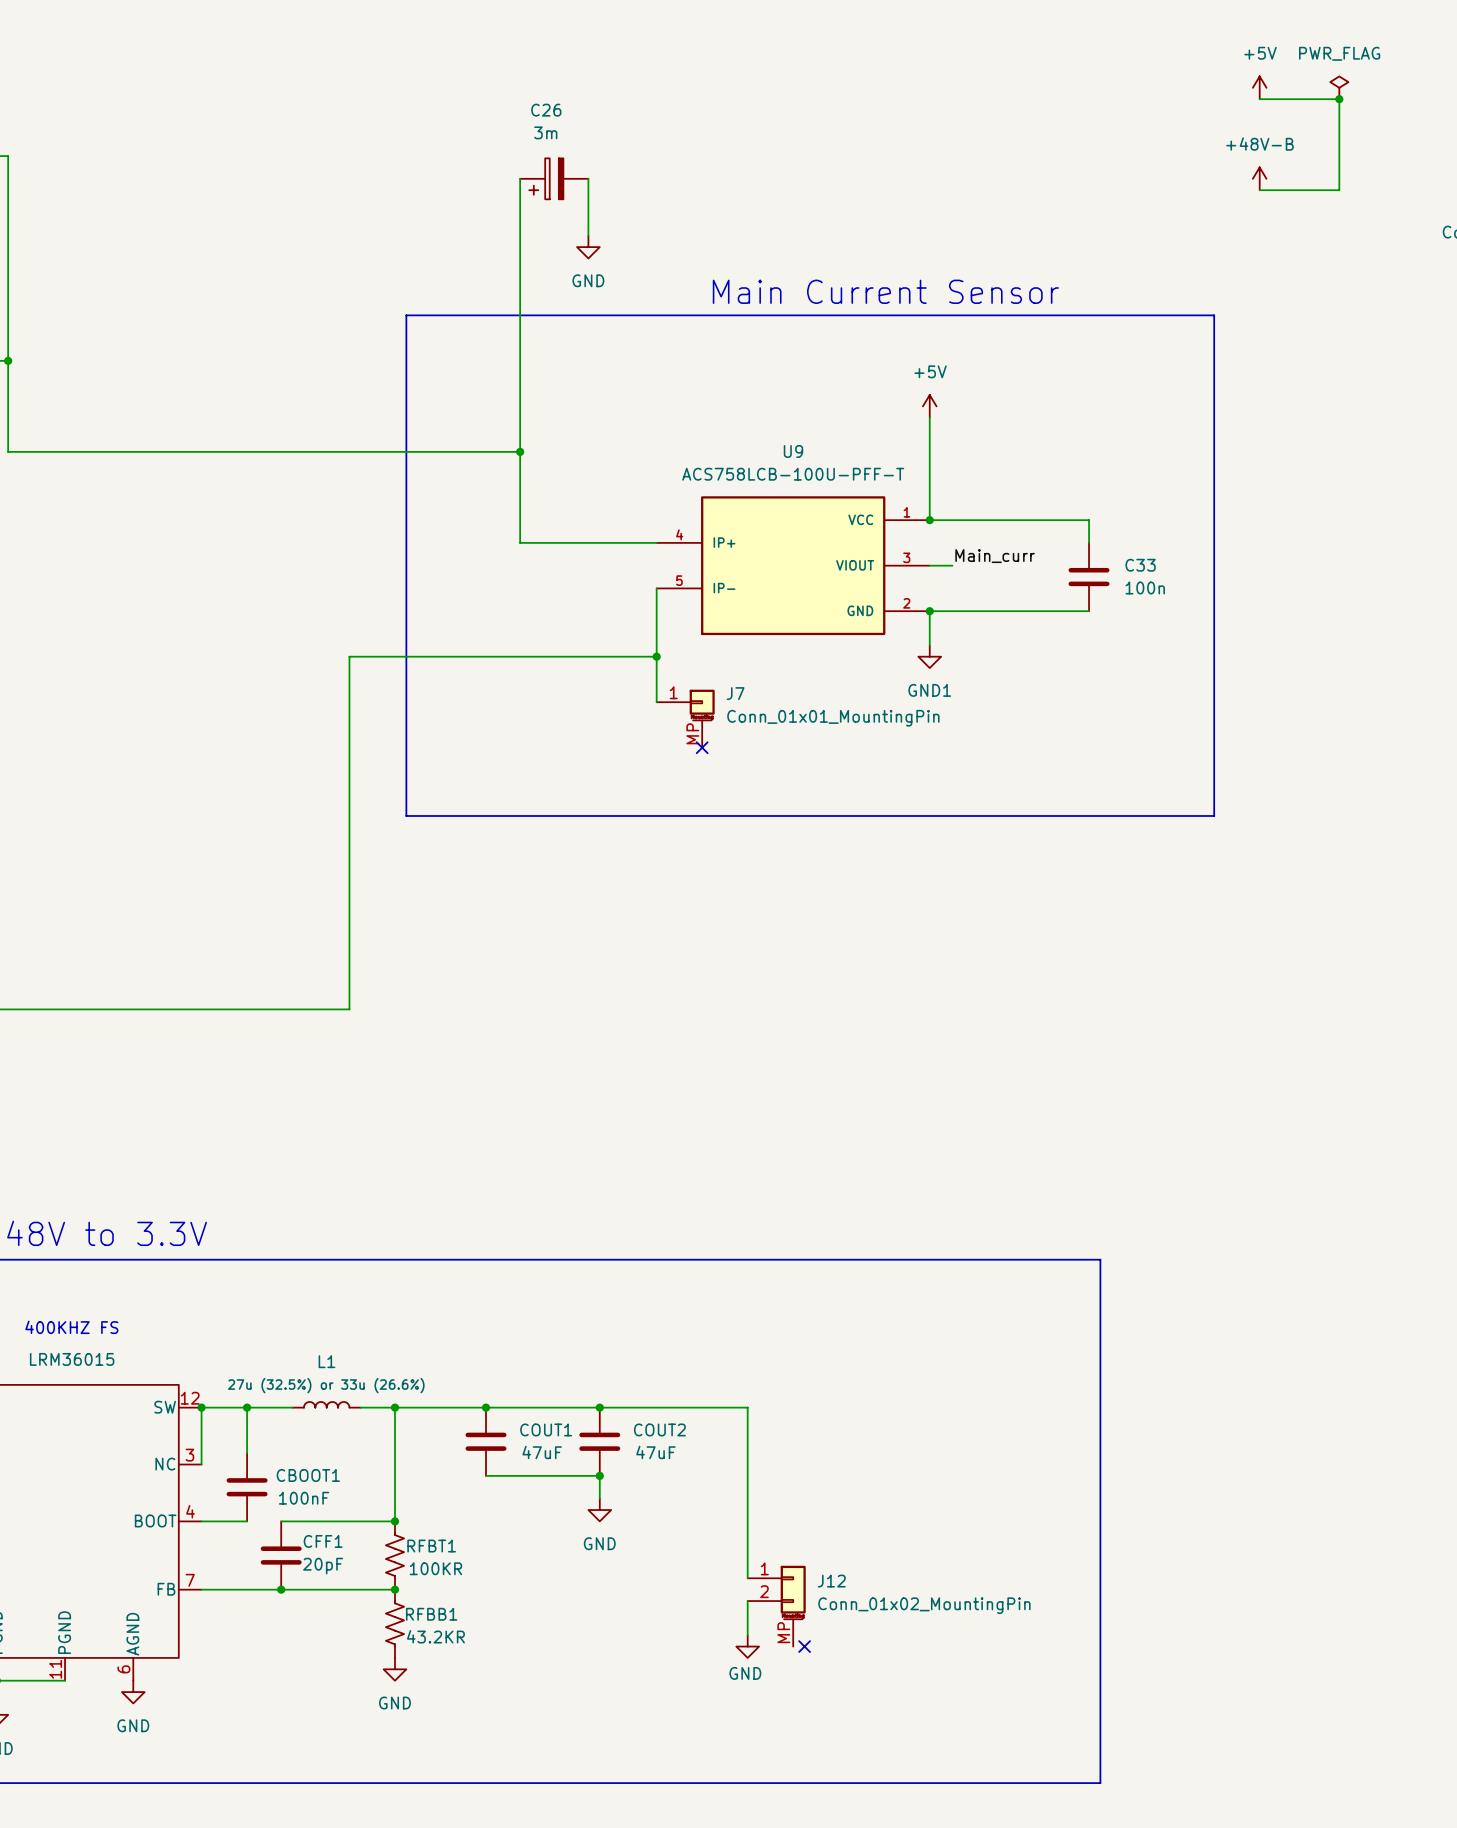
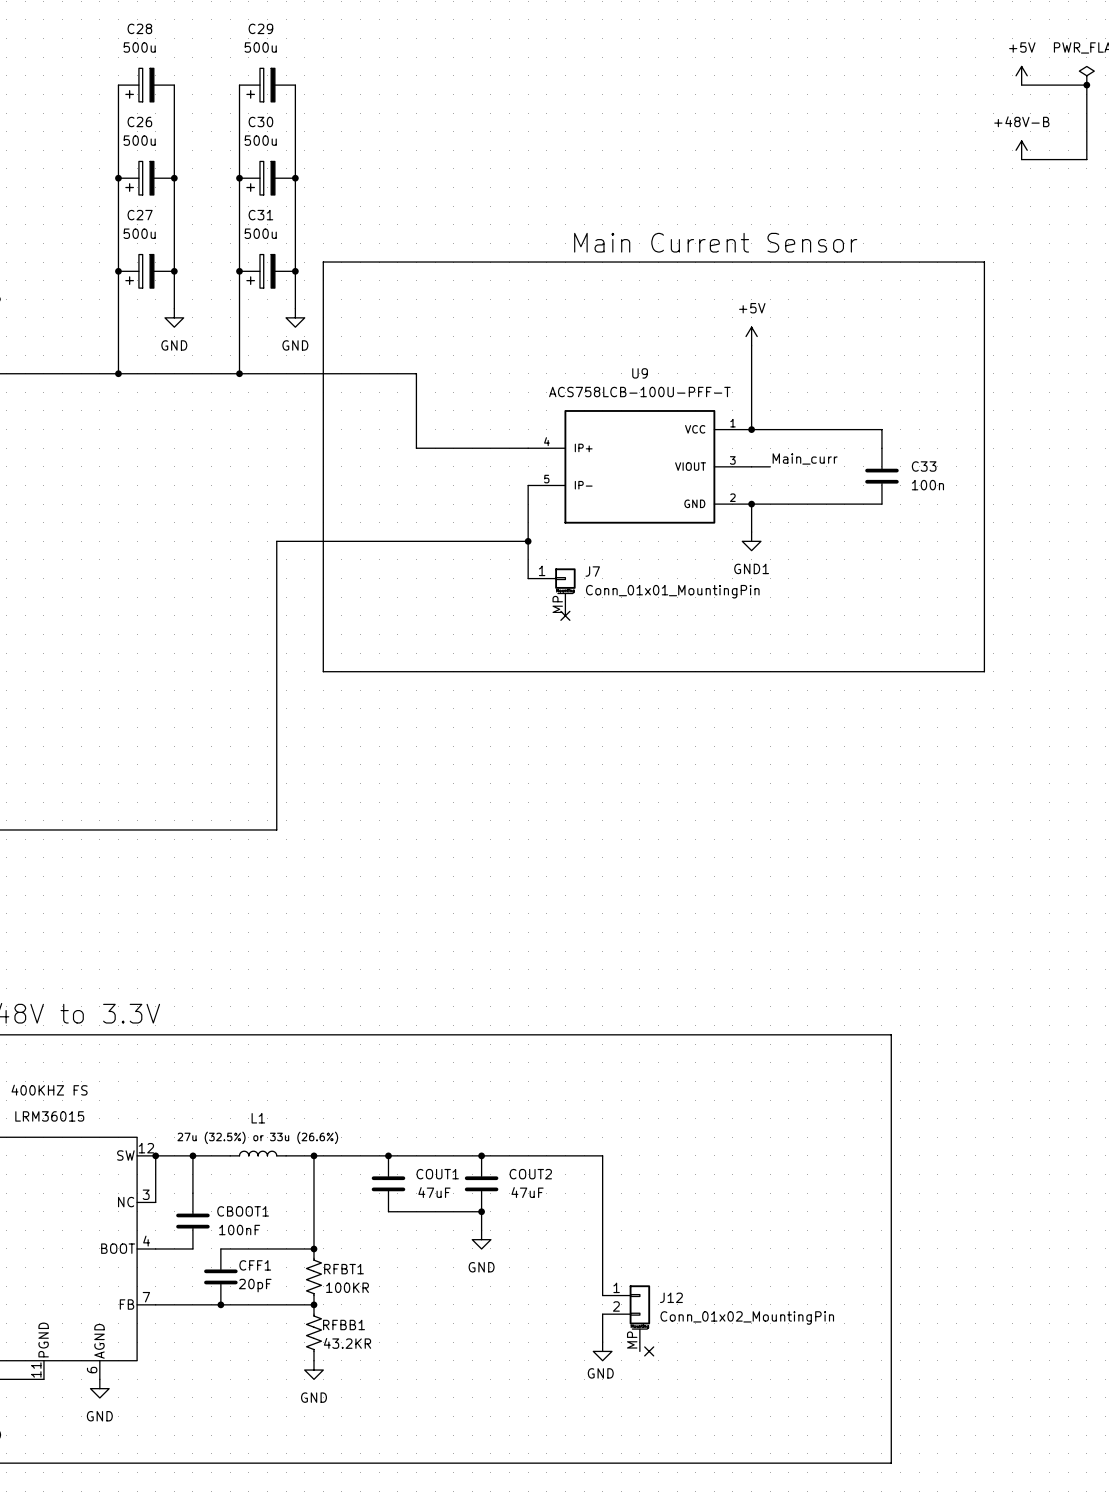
wire: none -> (118, 85) (118, 373)
C28: none -> 500u (146, 85)
wire: none -> (174, 85) (174, 308)
wire: none -> (239, 85) (239, 373)
C29: none -> 500u (267, 85)
C26 value: 3m (545, 132) -> 500u (139, 140)
wire: (520, 178) (520, 451) -> (295, 85) (295, 308)
C26 position: (554, 178) -> (146, 178)
wire: (588, 178) (588, 235) -> none
junction: none -> (118, 178)
junction: none -> (174, 178)
junction: none -> (239, 178)
C30: none -> 500u (267, 178)
junction: none -> (295, 178)
power symbol: GND (588, 247) -> none
junction: none -> (118, 271)
C27: none -> 500u (146, 271)
junction: none -> (174, 271)
junction: none -> (239, 271)
C31: none -> 500u (267, 271)
junction: none -> (295, 271)
power symbol: none -> GND (174, 317)
power symbol: none -> GND (295, 317)
junction: none -> (118, 373)
junction: none -> (239, 373)
junction: (520, 451) -> none

